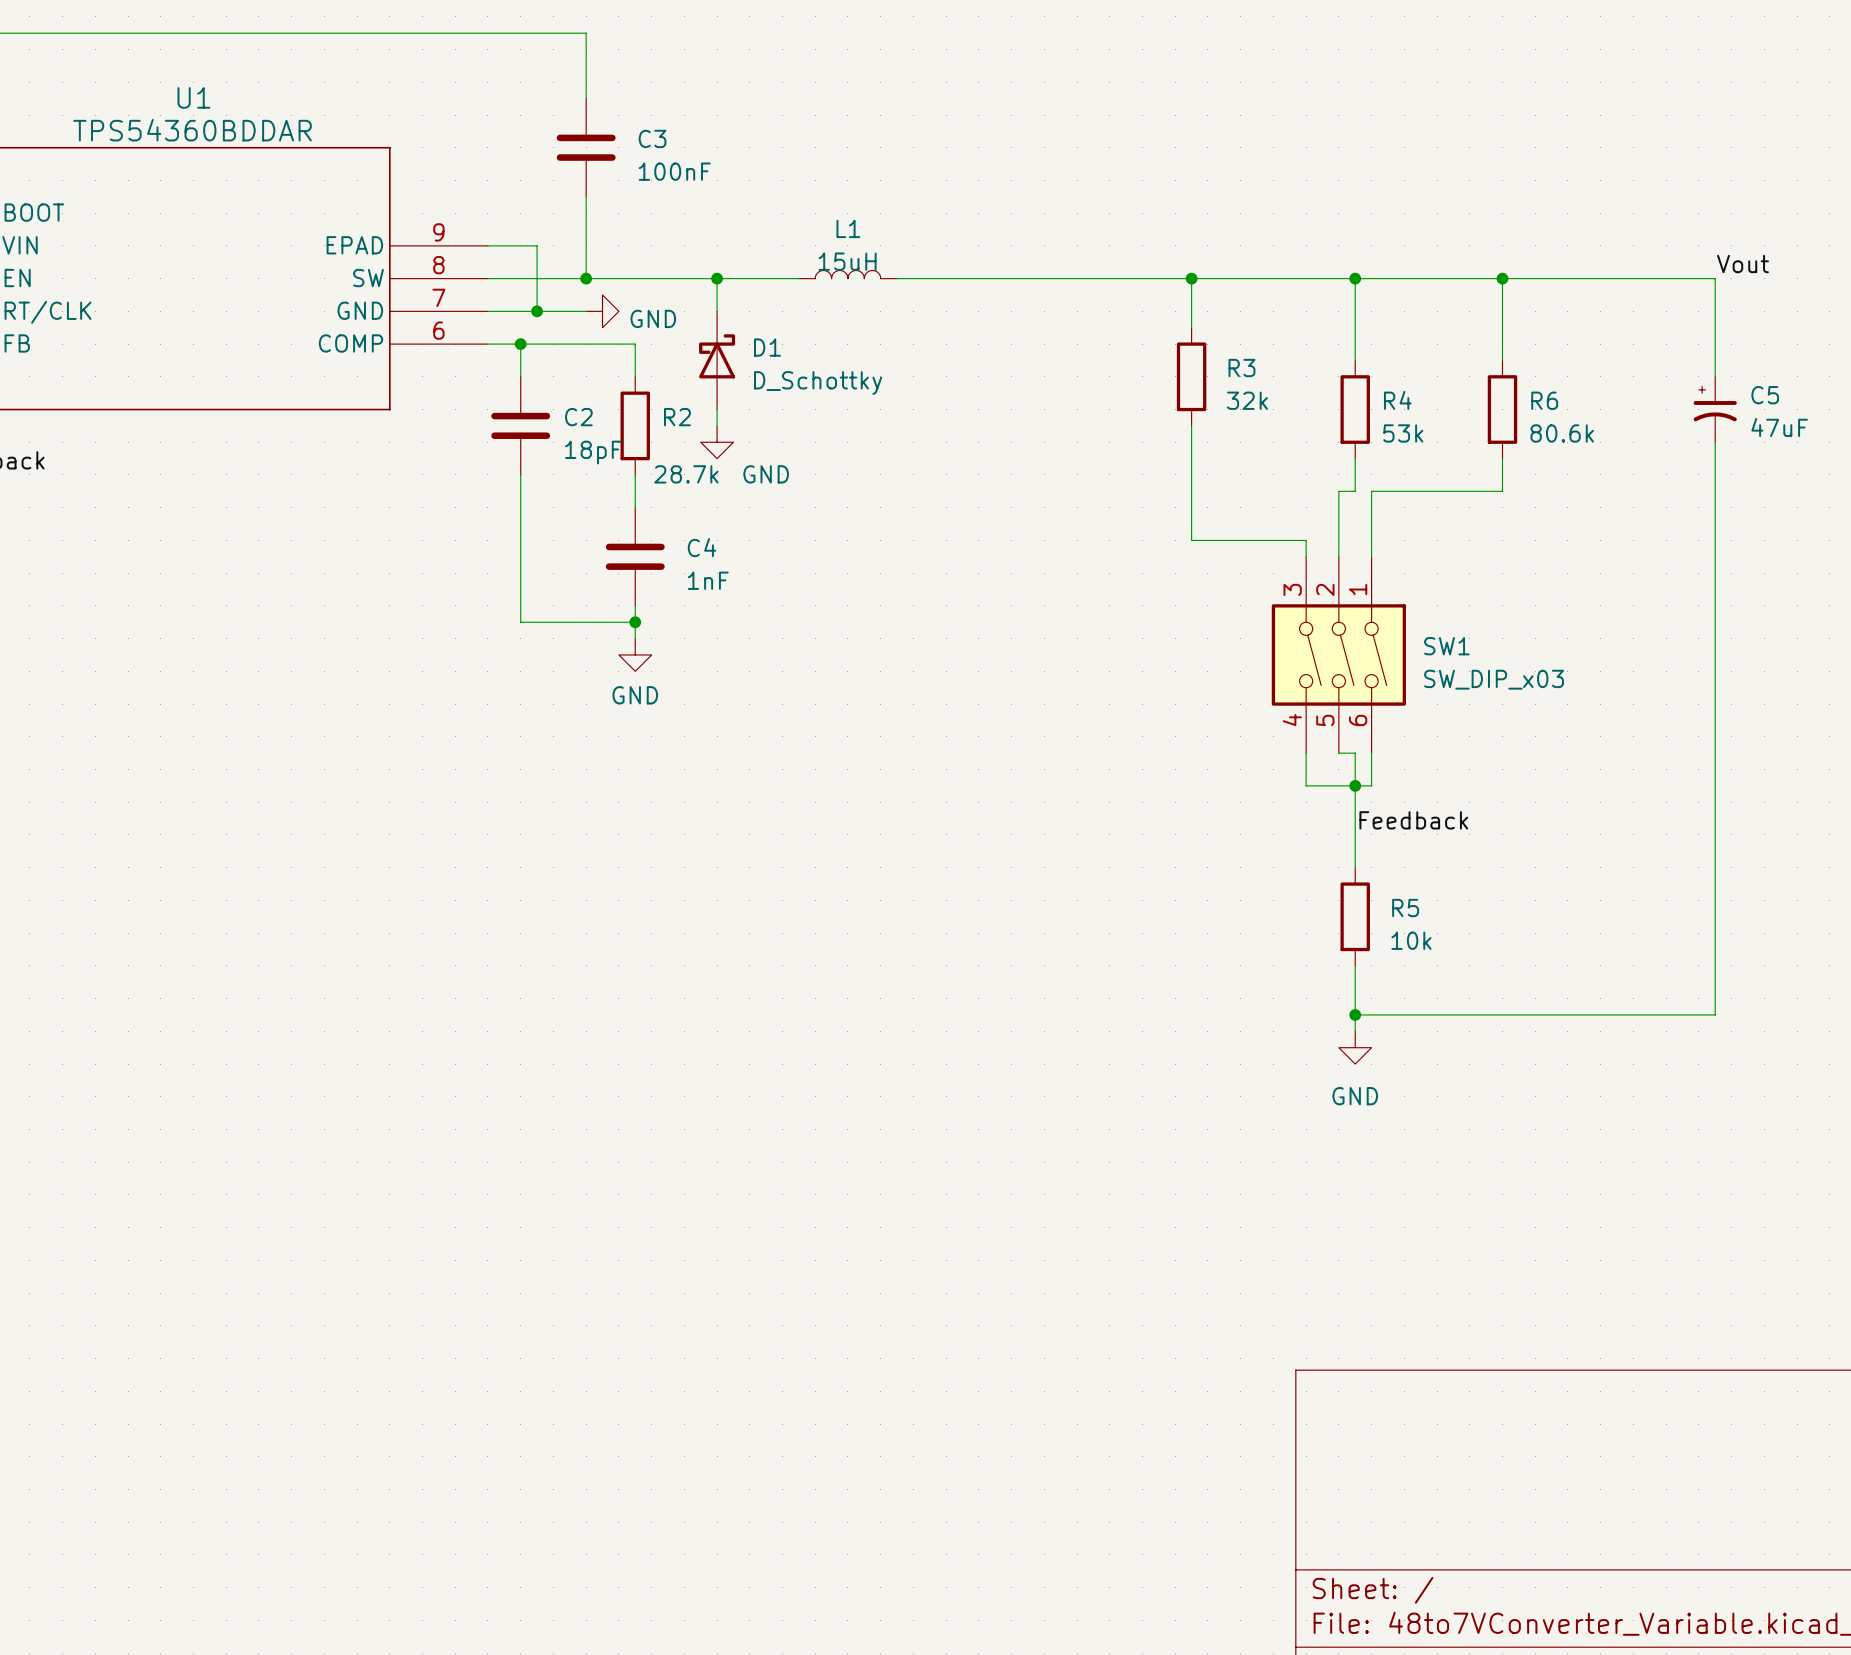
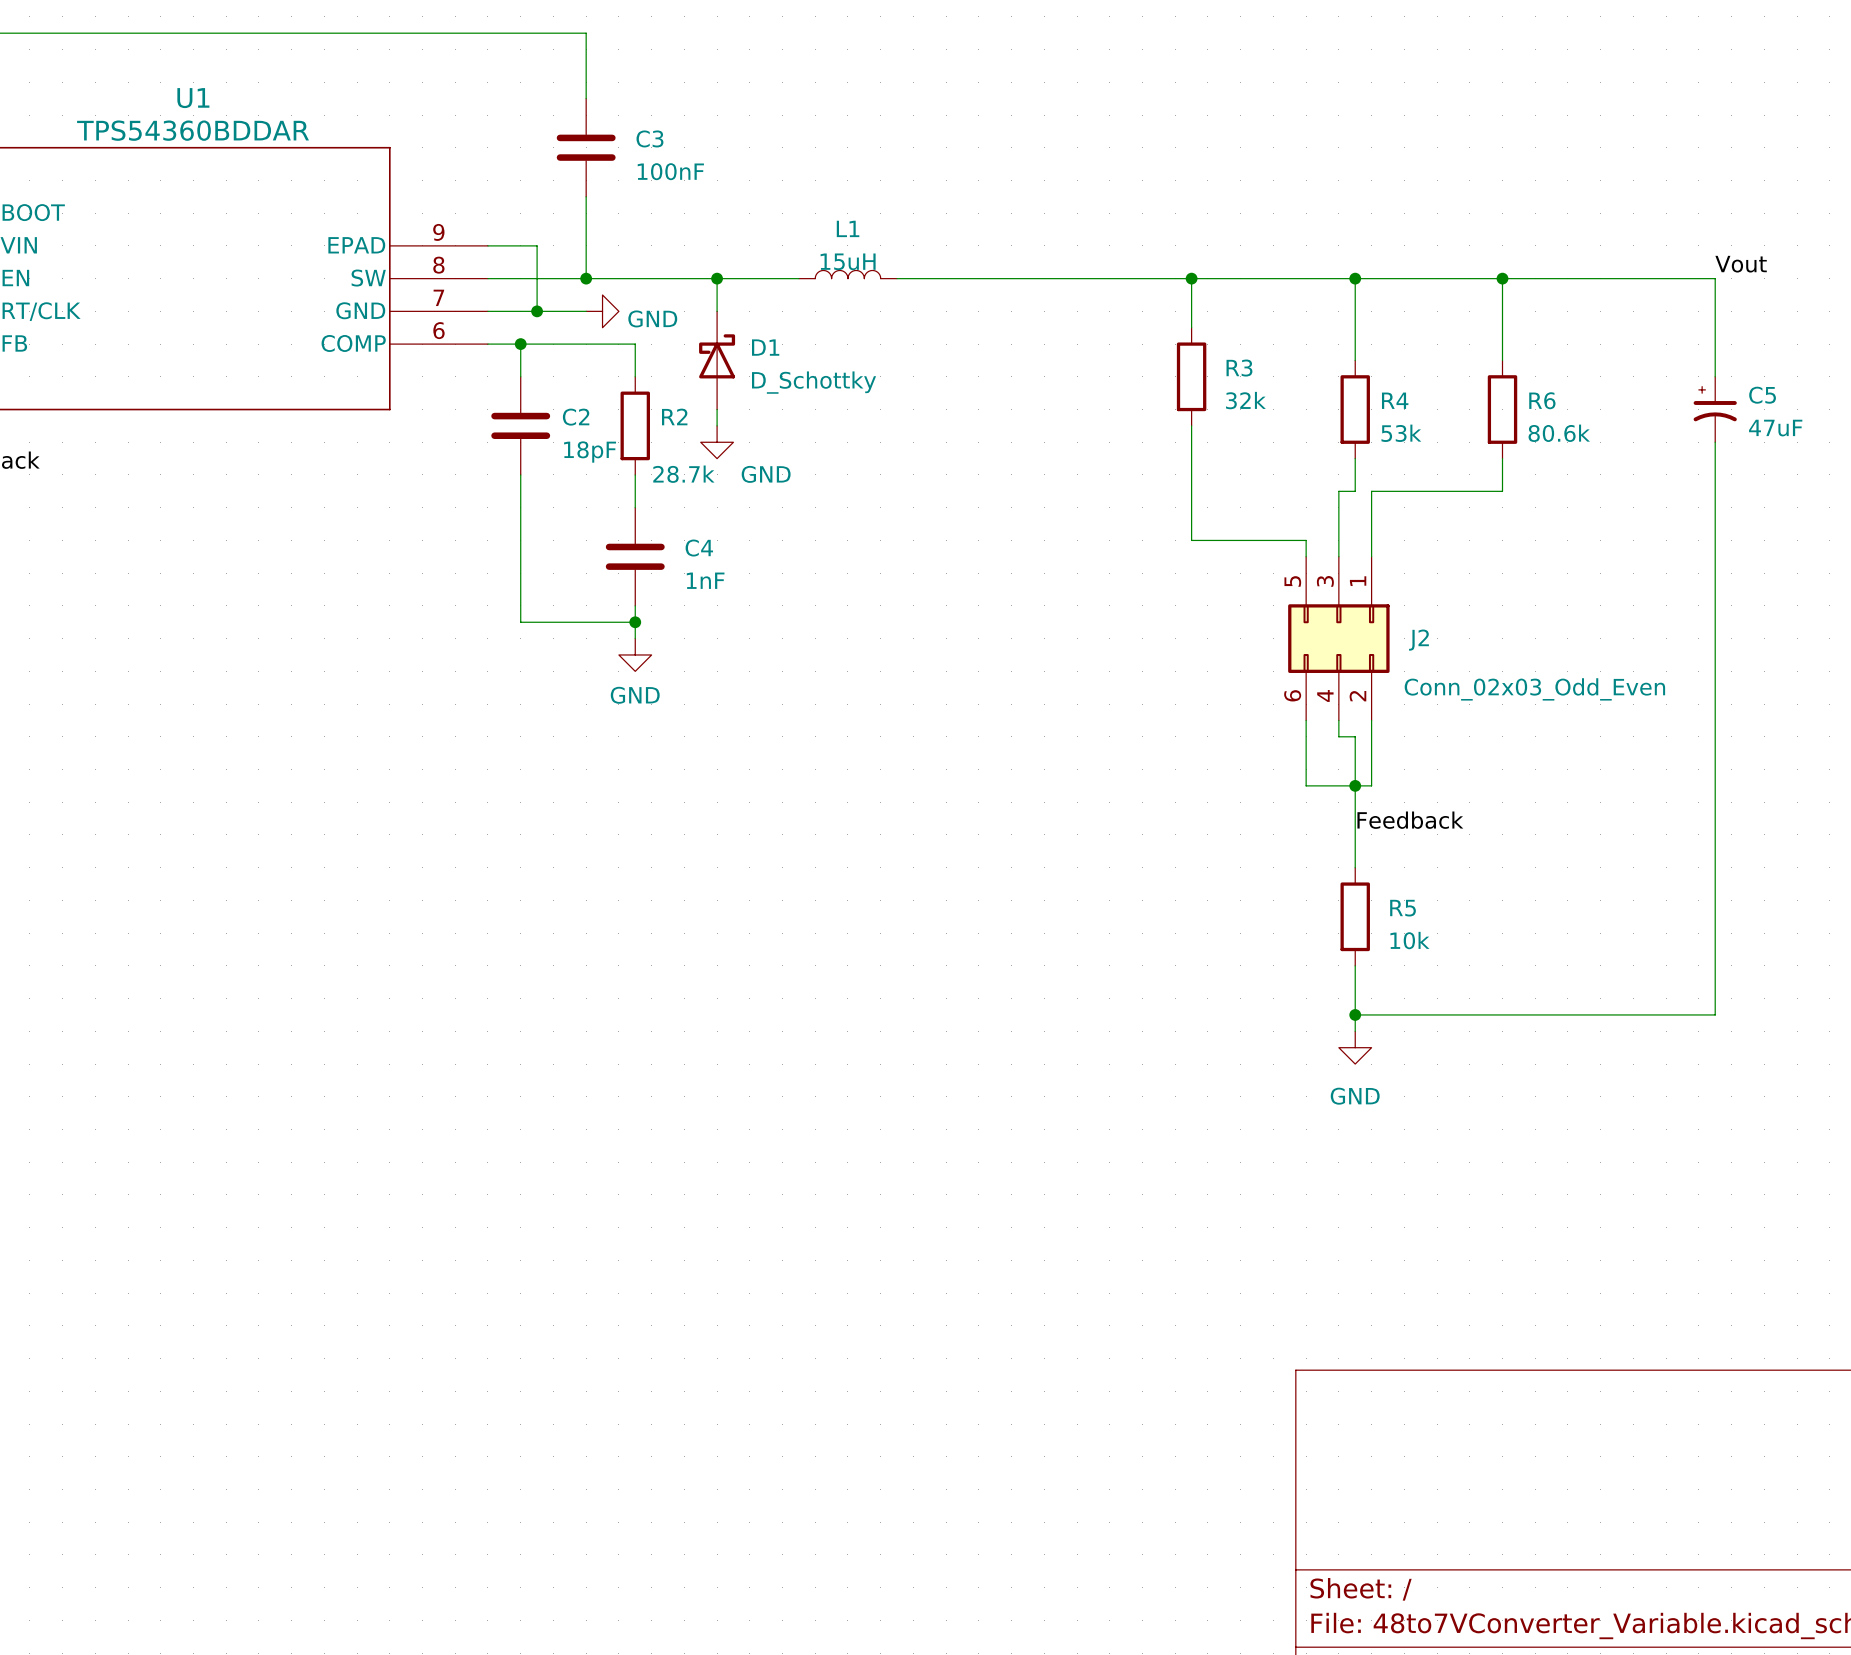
J2: none -> Conn_02x03_Odd_Even (1338, 638)
SW1: SW_DIP_x03 (1338, 654) -> none
wire: (1338, 753) (1355, 753) -> (1338, 720) (1338, 736) (1355, 736) (1355, 753)

